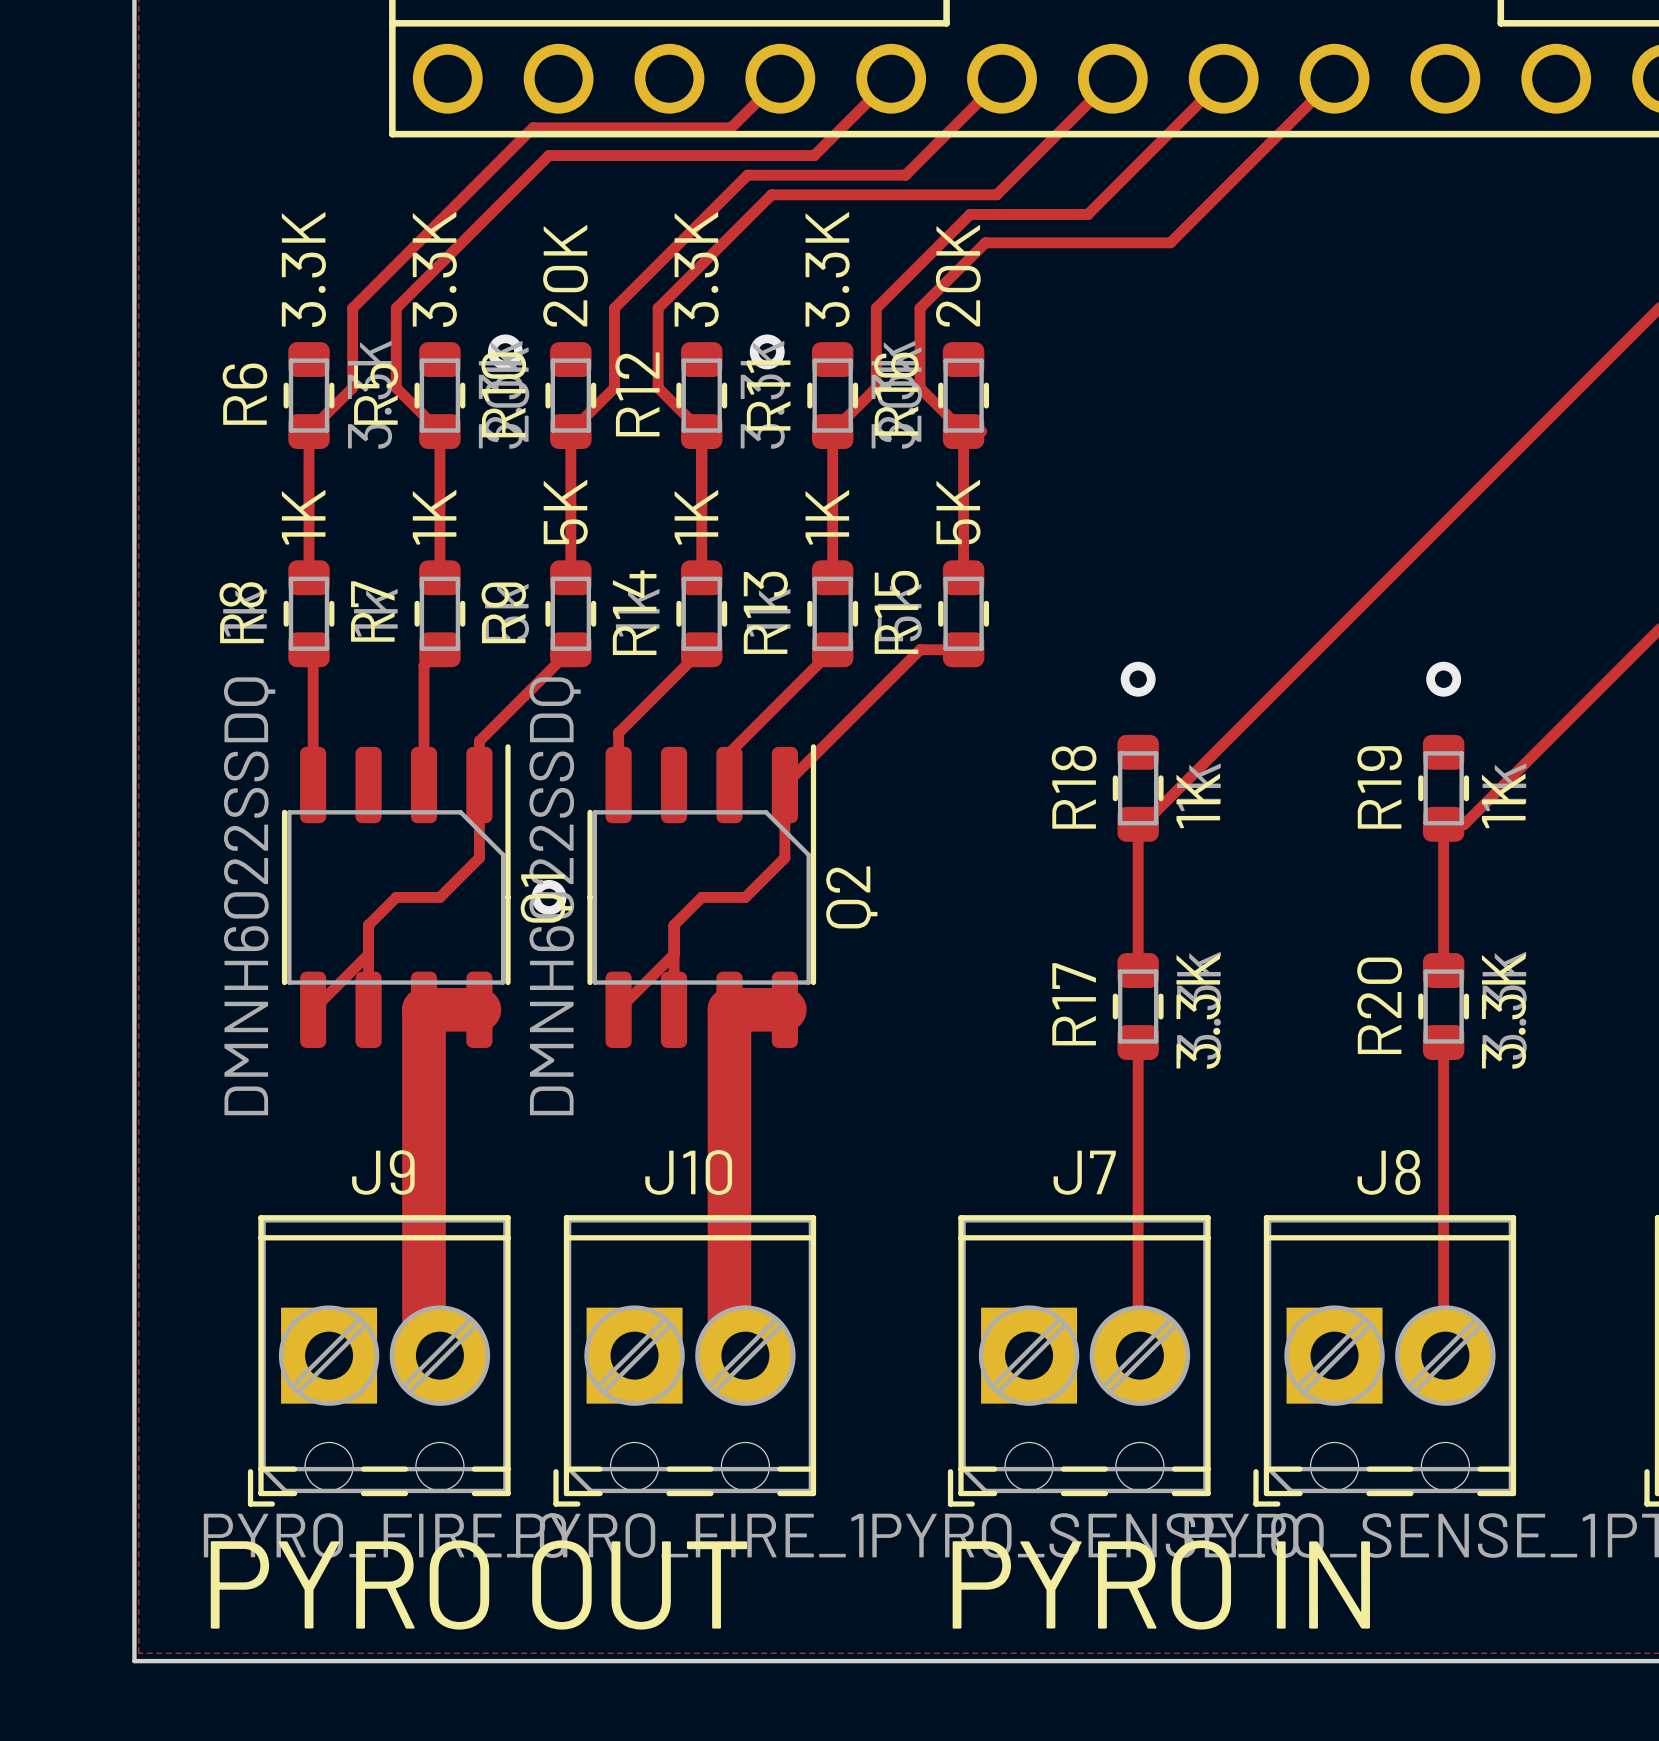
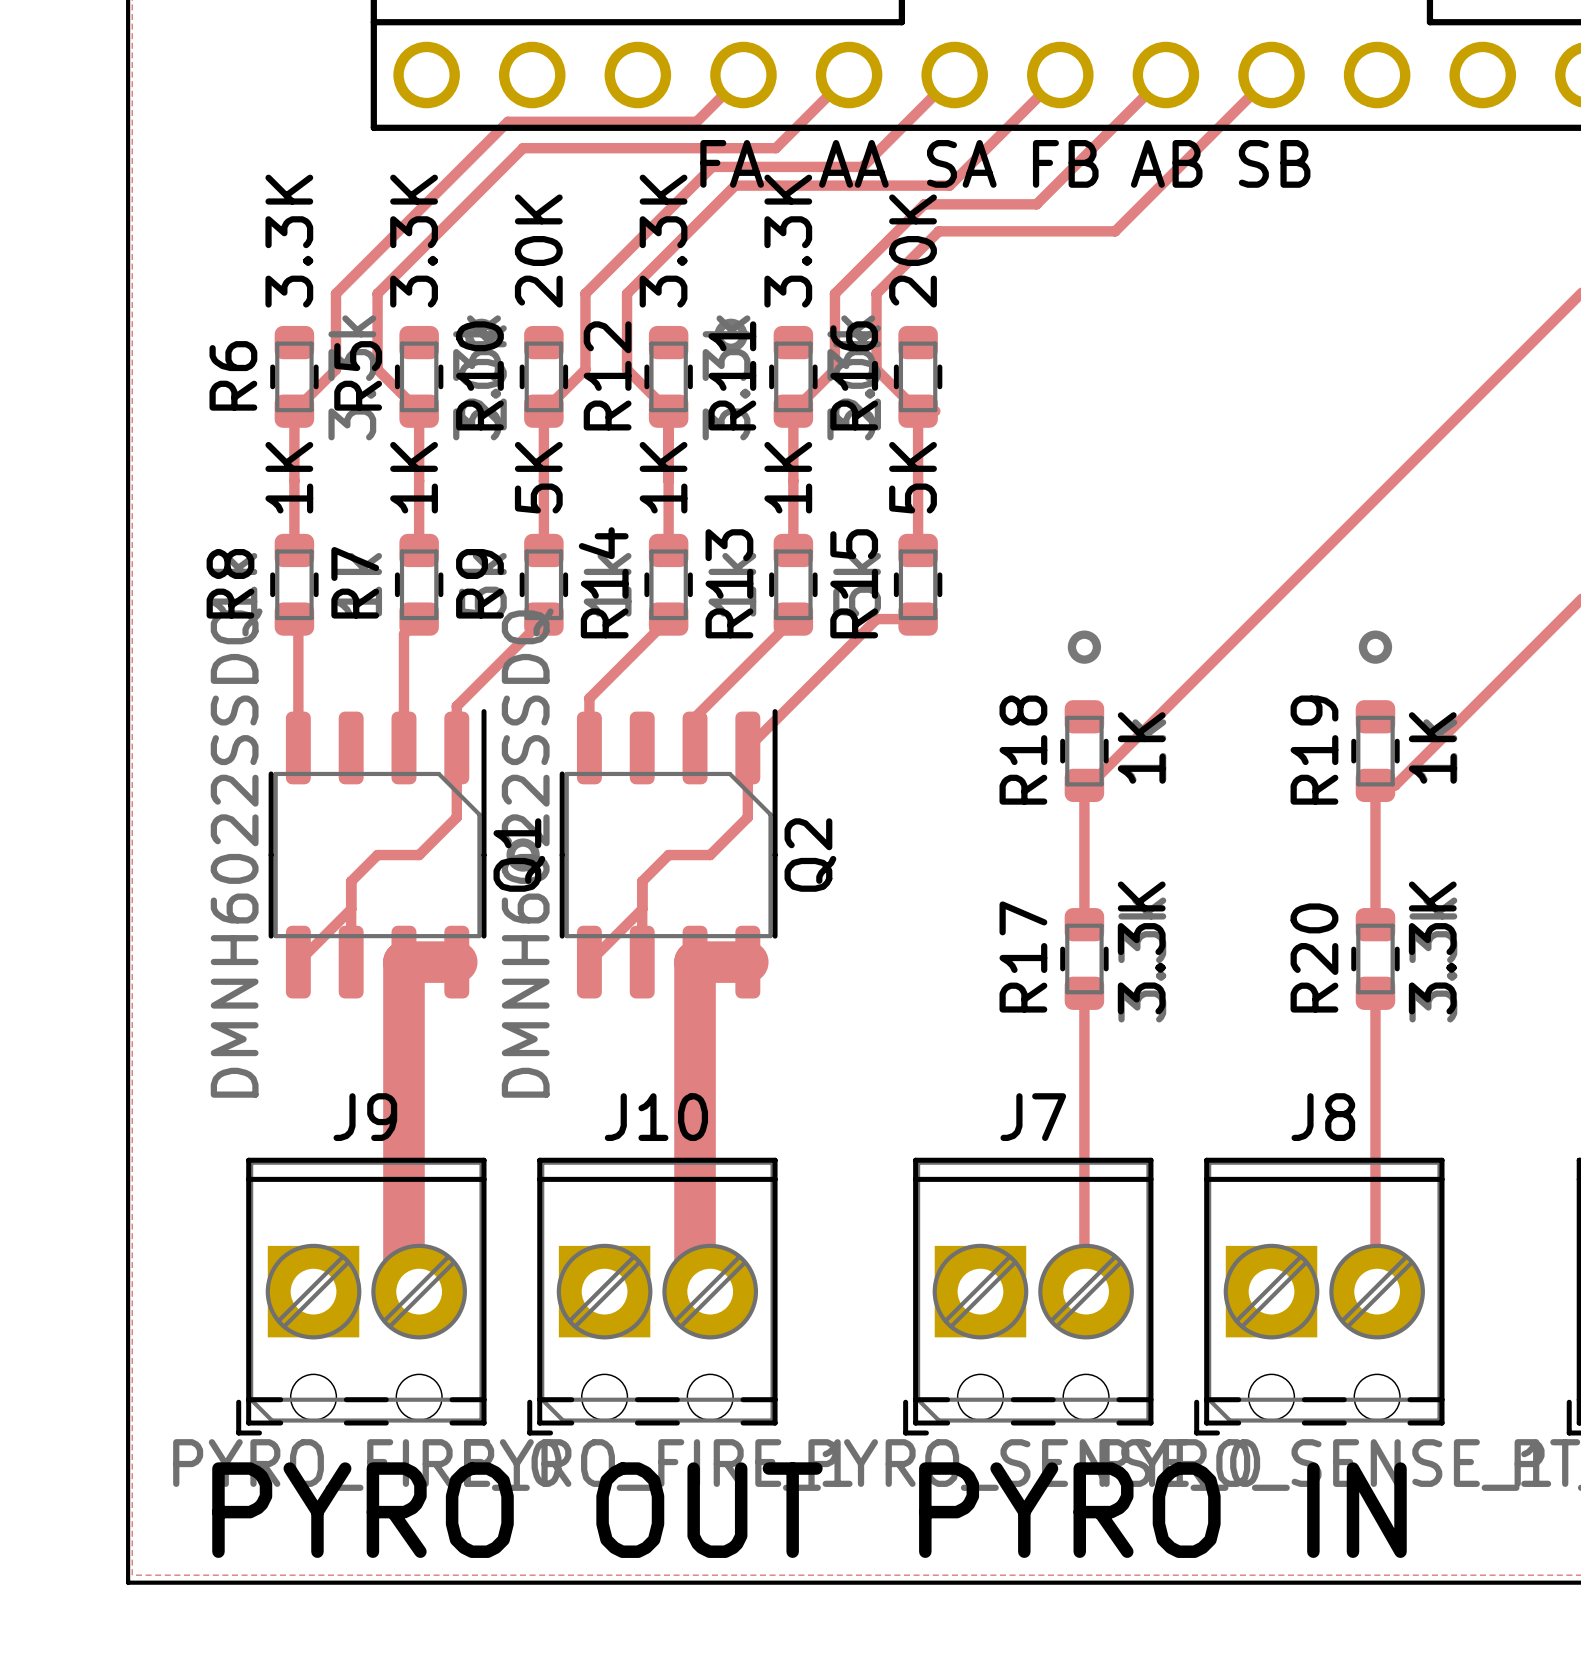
text: none -> FA (732, 163)
text: none -> AA (853, 163)
text: none -> SA (961, 163)
text: none -> FB (1065, 163)
text: none -> AB (1166, 163)
text: none -> SB (1274, 163)

